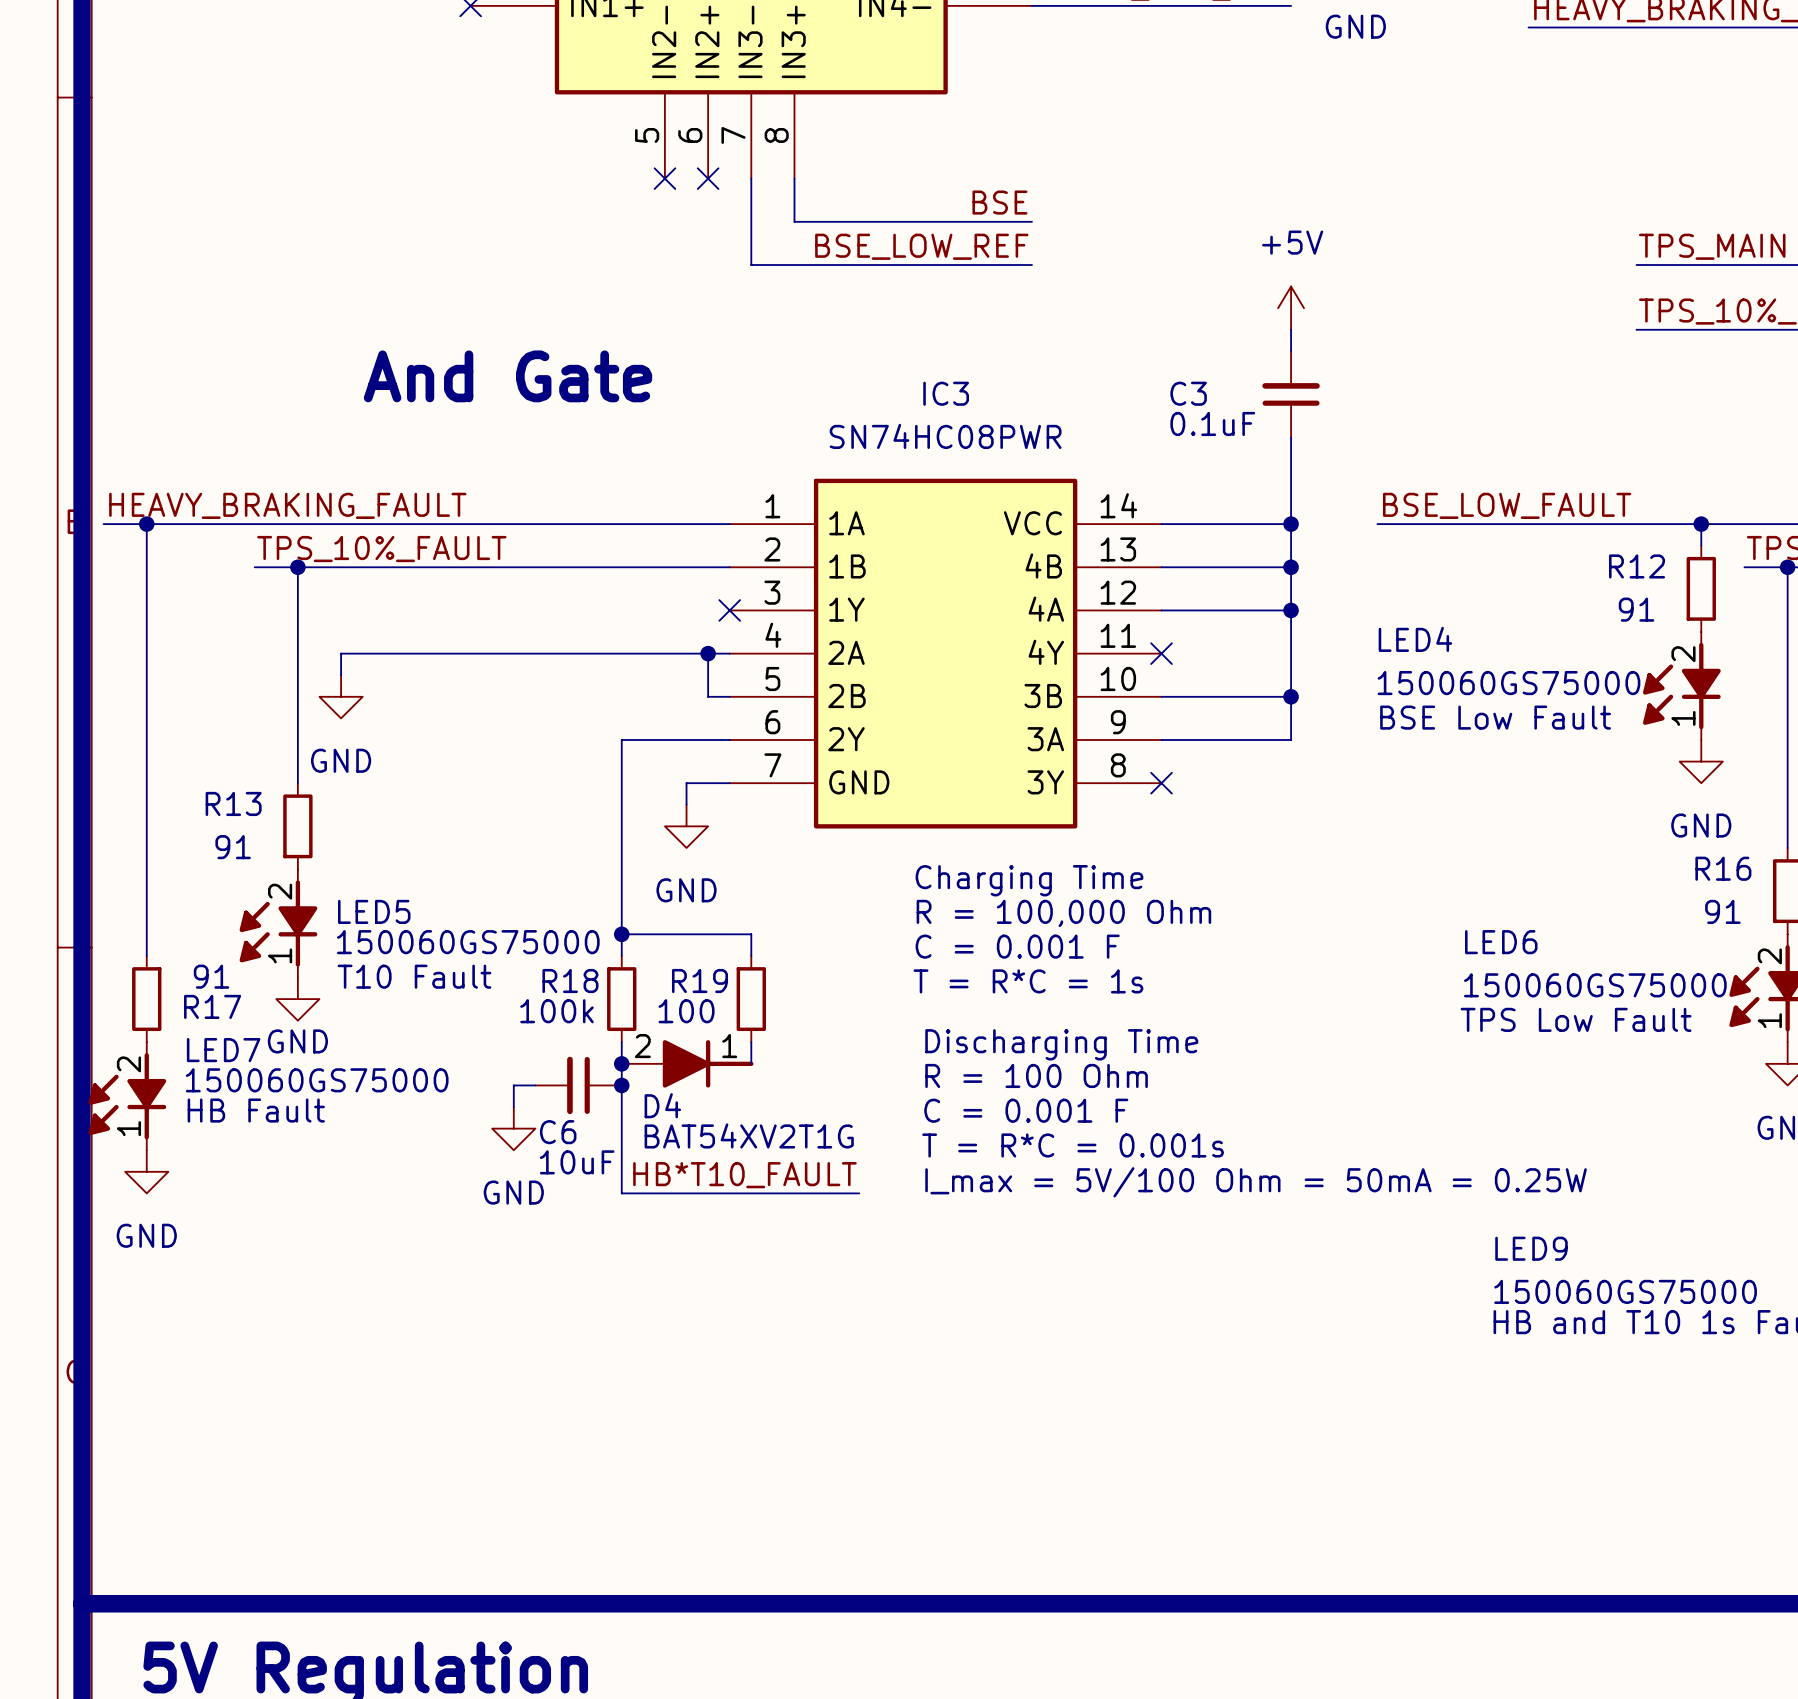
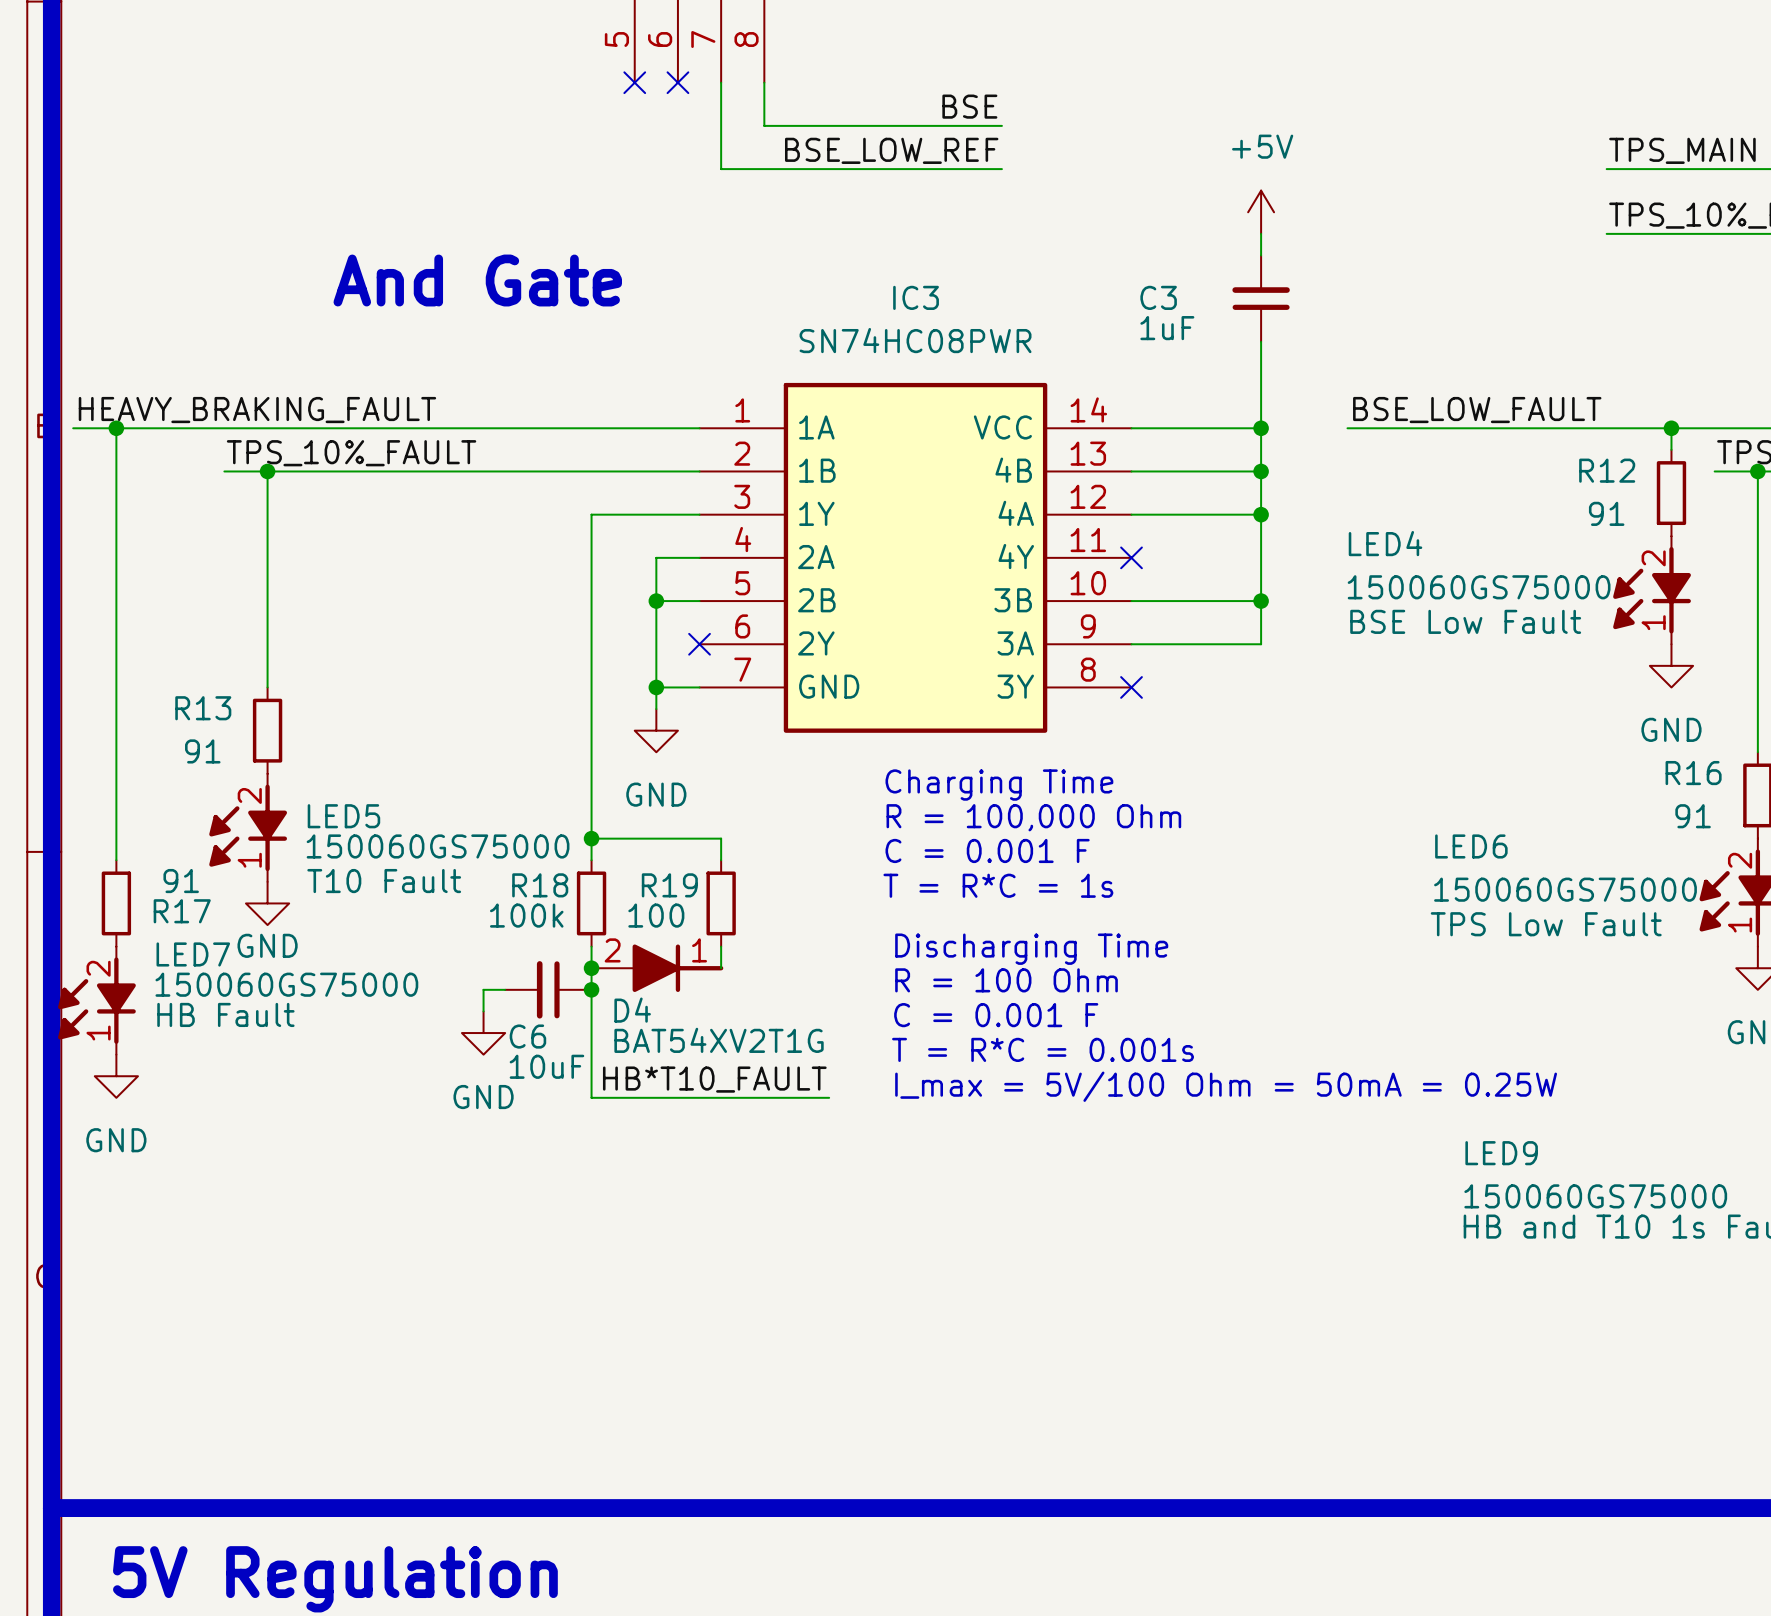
C3 value: 0.1uF (1212, 423) -> 1uF (1167, 328)
no-connect mark: (729, 610) -> none
wire: (686, 653) (341, 653) (341, 675) -> (656, 557) (656, 687)
wire: (708, 653) (708, 696) -> (656, 601) (677, 601)
junction position: (708, 653) -> (656, 601)
power symbol: GND (341, 696) -> none
wire: (621, 740) (729, 740) -> (591, 644) (591, 514) (699, 514)
no-connect mark: none -> (699, 644)
junction: none -> (656, 687)

